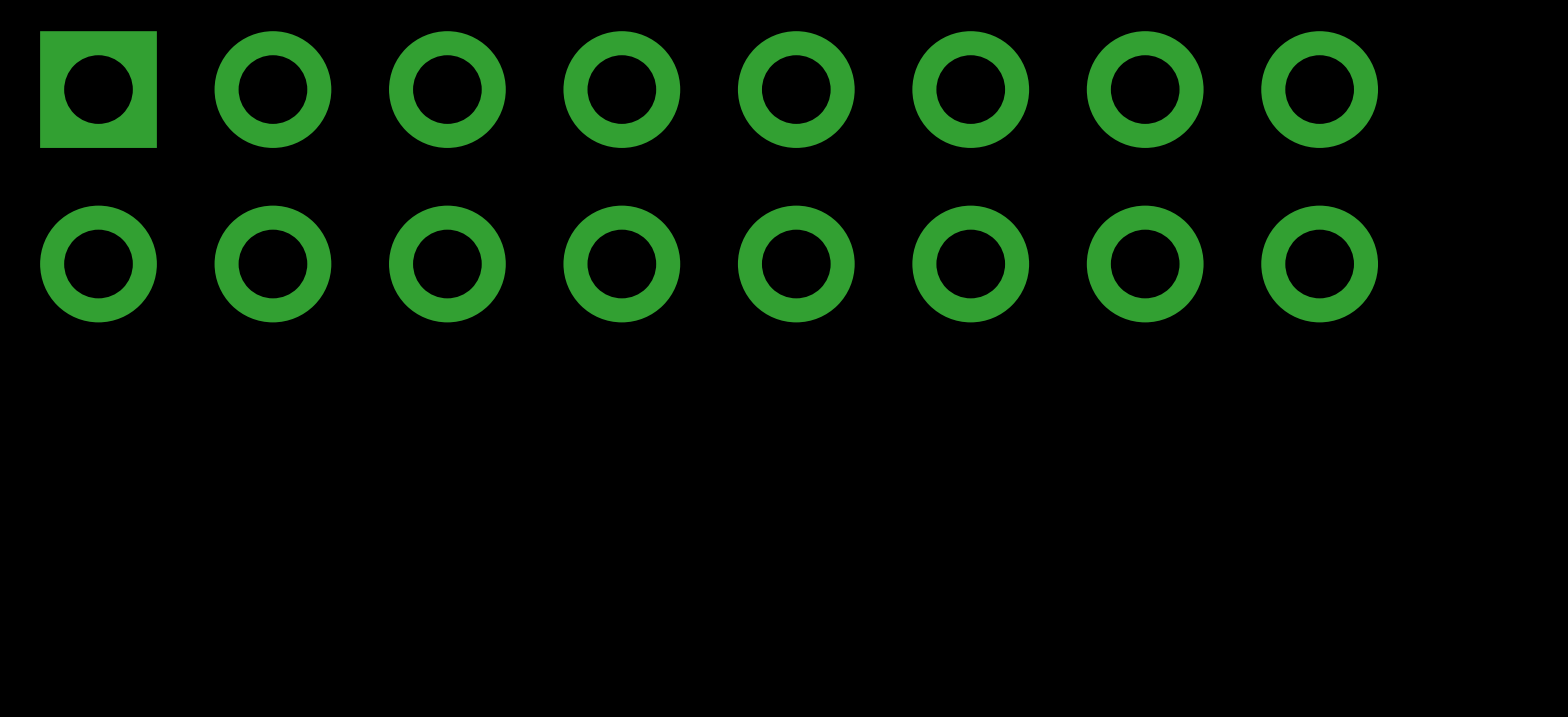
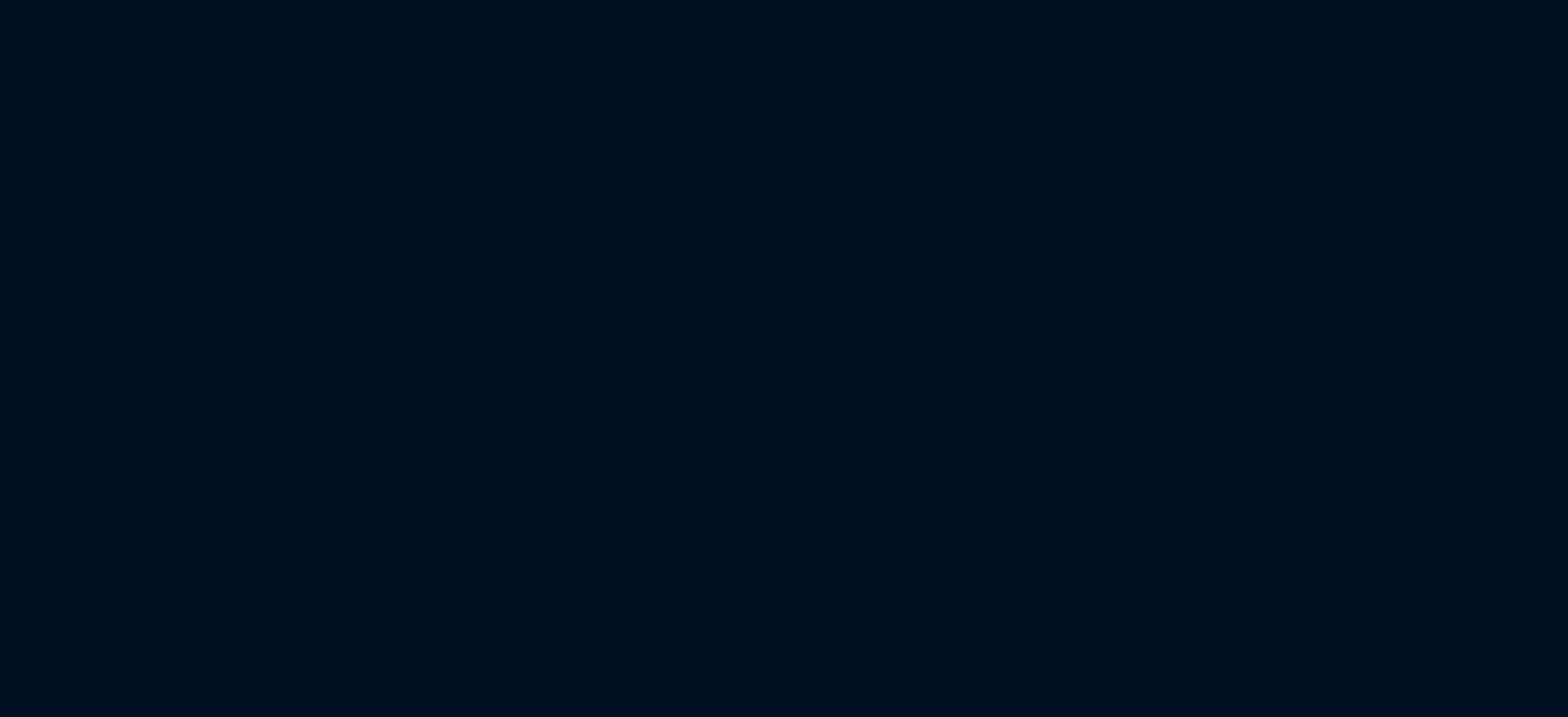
part: (709, 176) -> none

